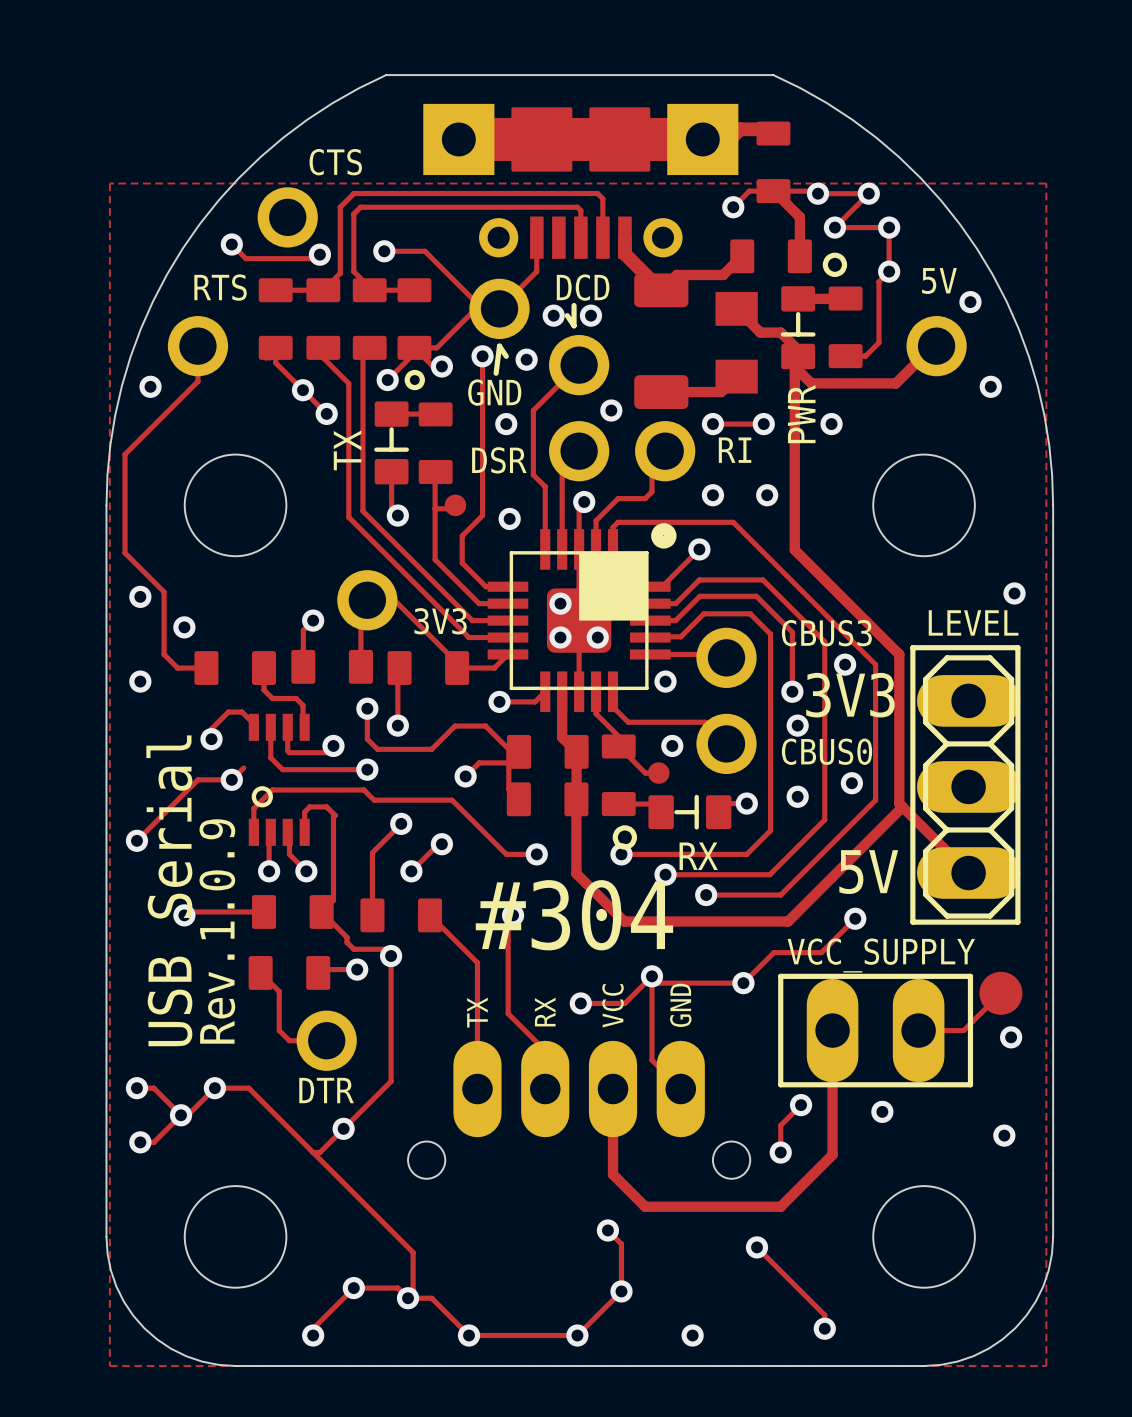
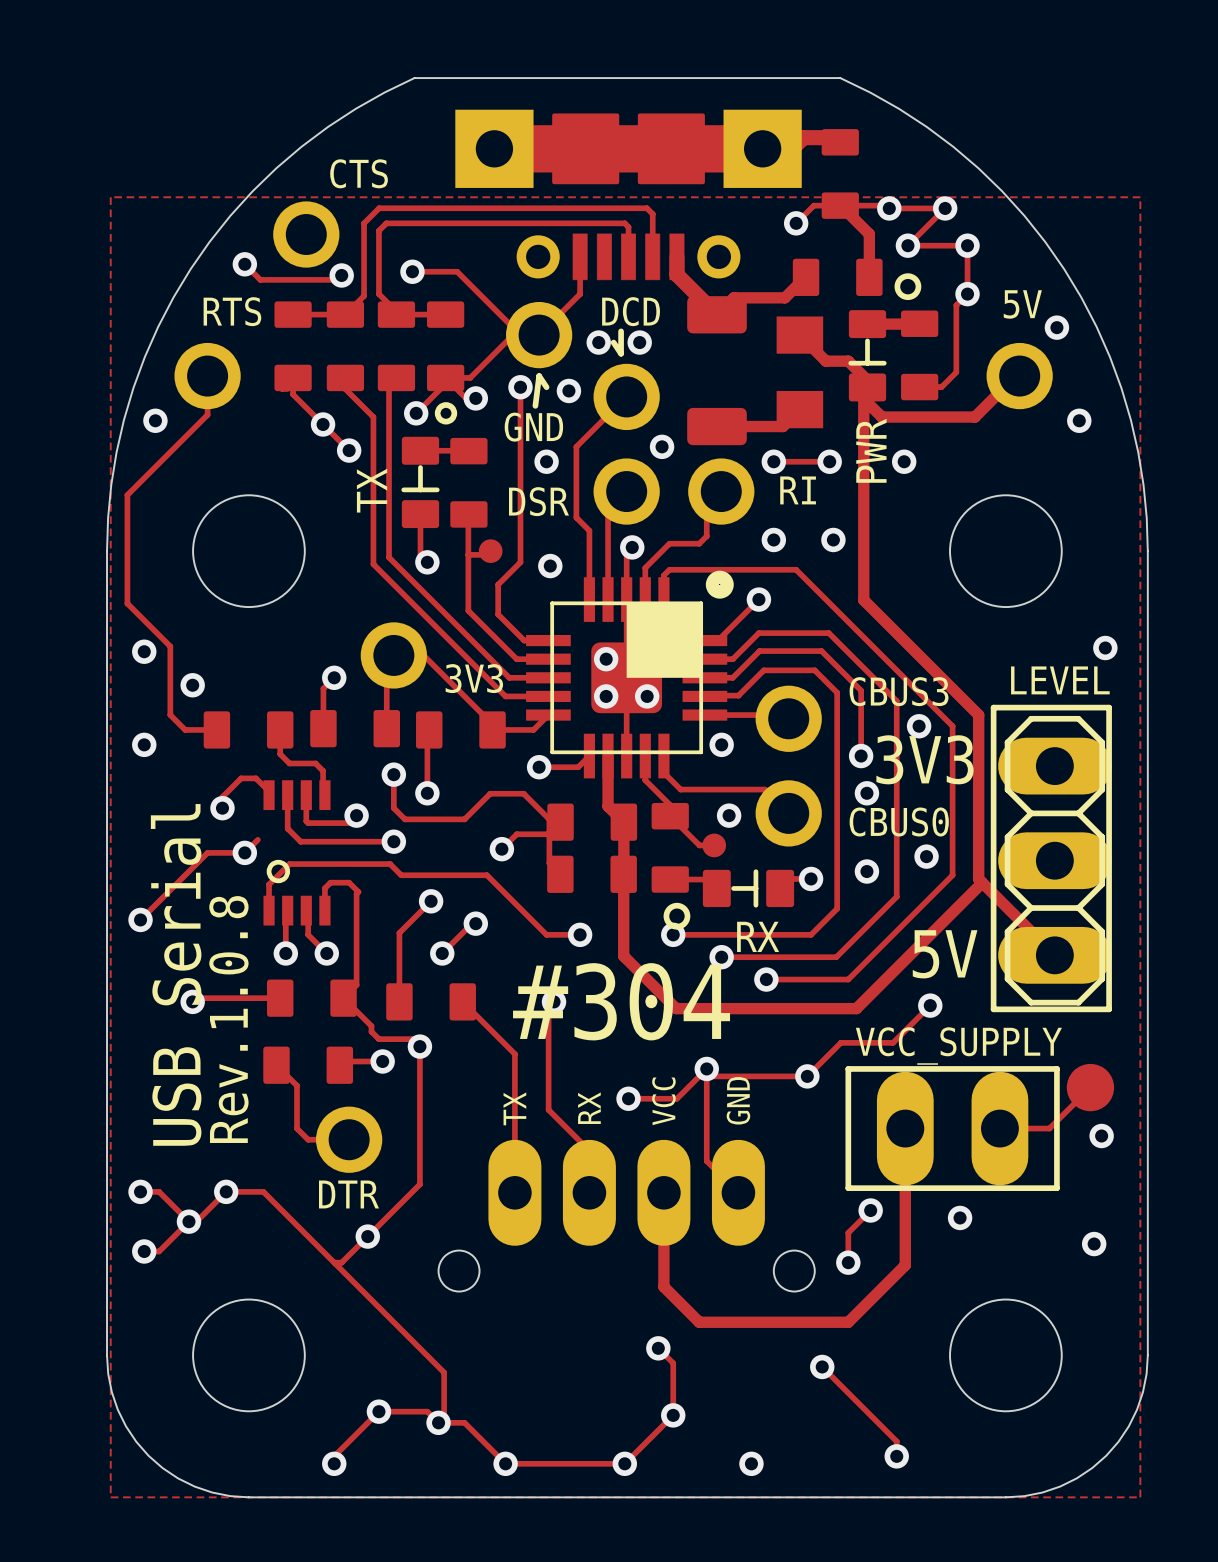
text: Rev.1.0.9 (217, 931) -> Rev.1.0.8 (228, 1019)

